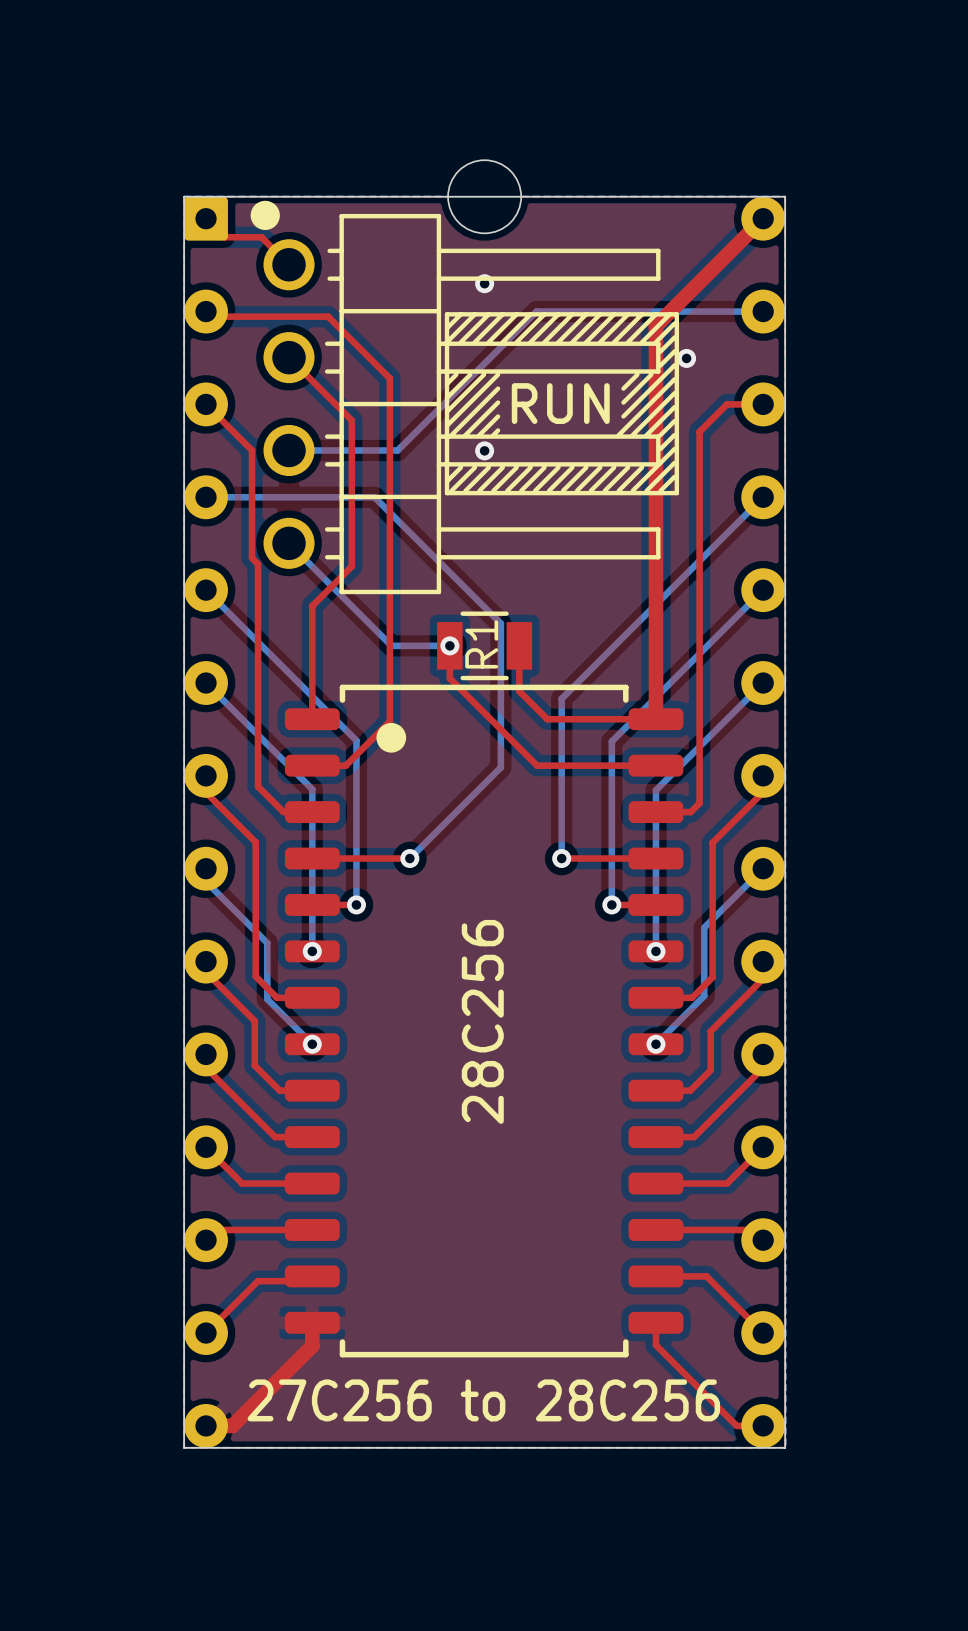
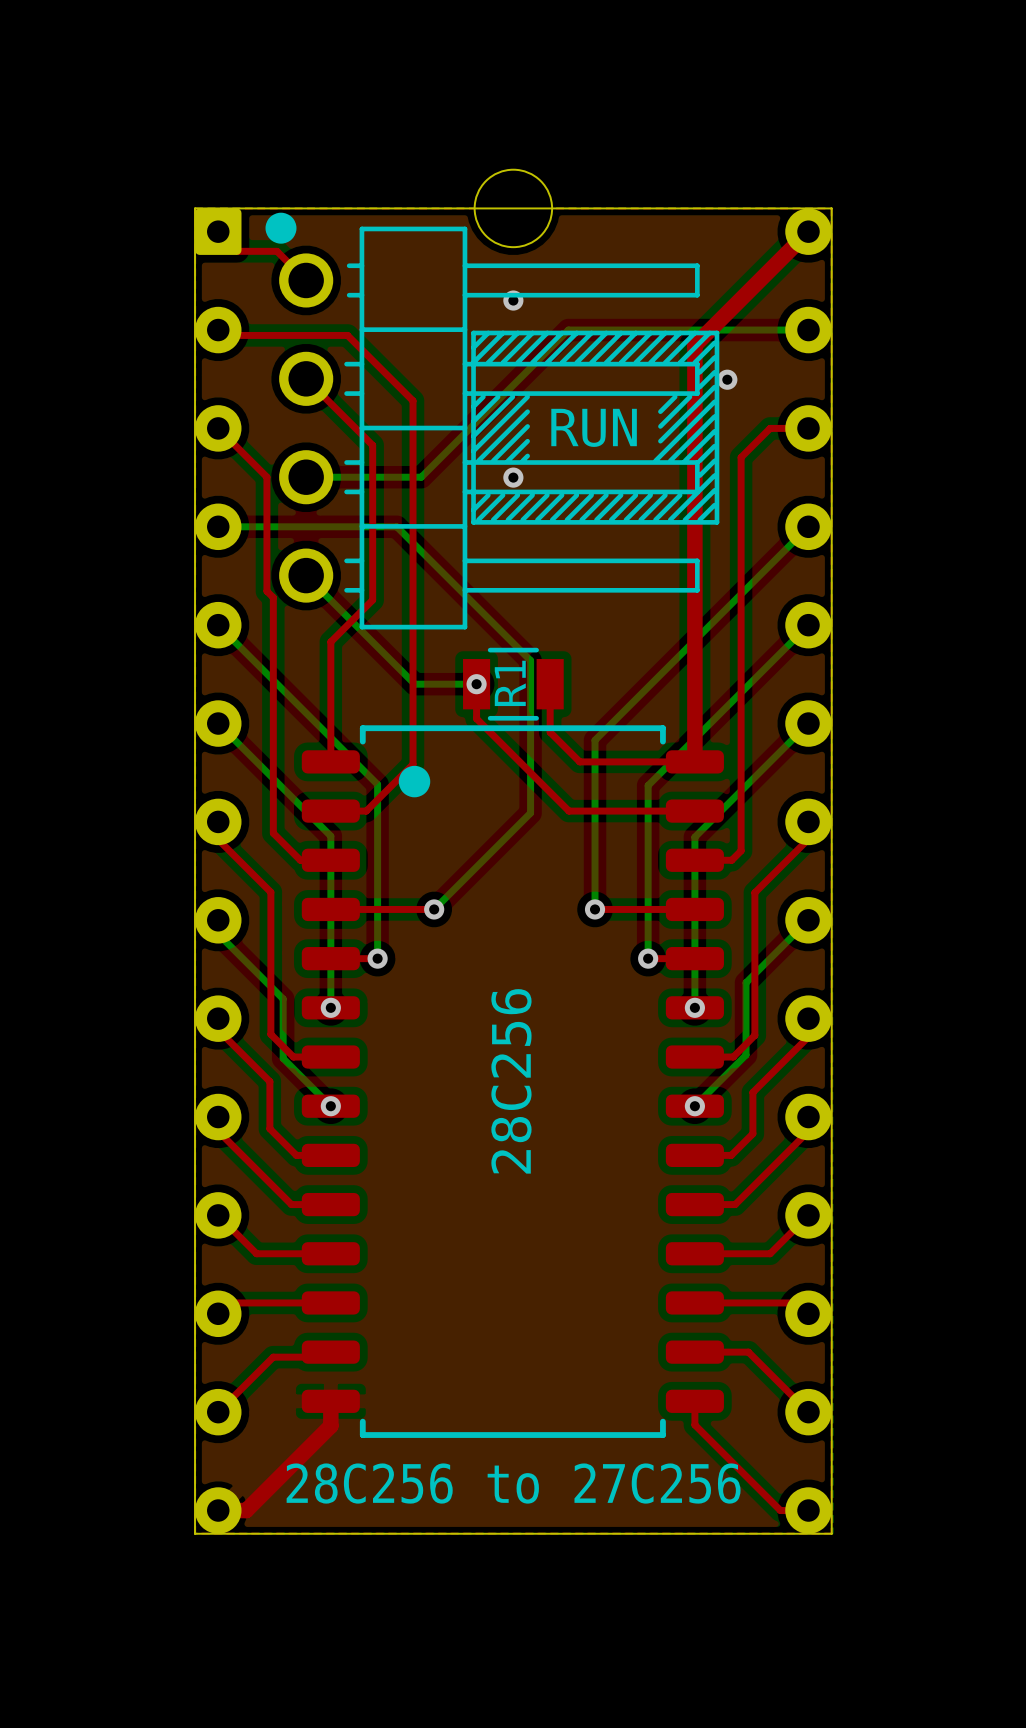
text: 27C256 to 28C256 (483, 1400) -> 28C256 to 27C256 (513, 1483)

